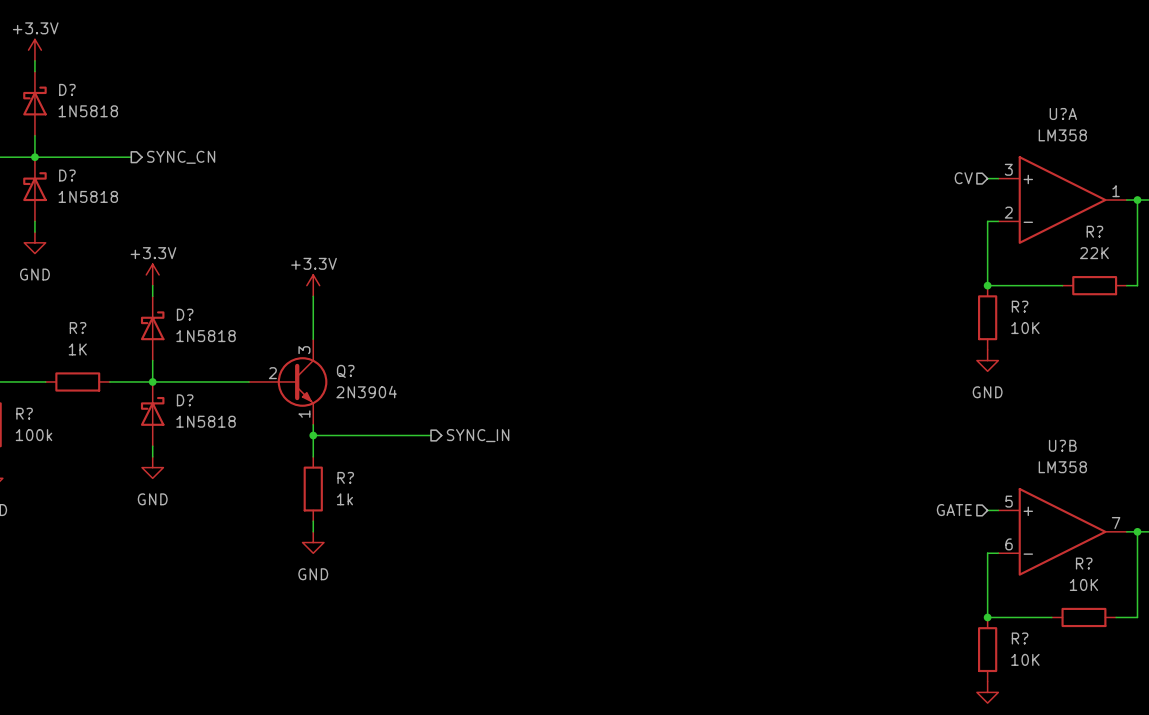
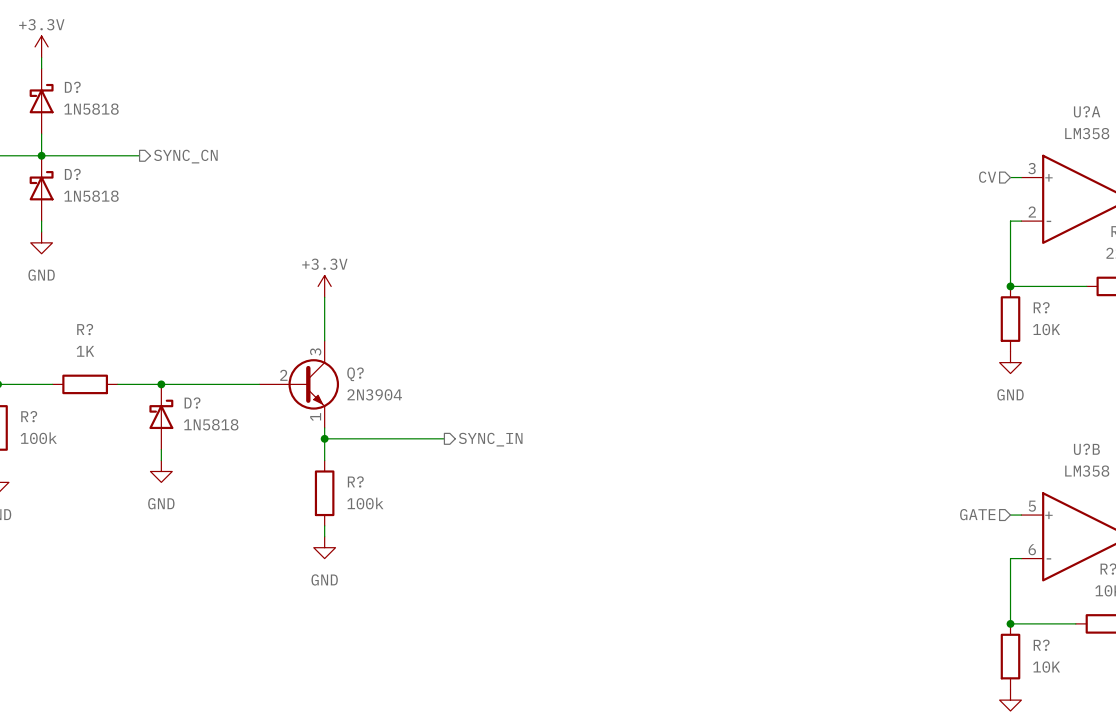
power symbol: +3.3V (152, 274) -> none
wire: (152, 285) (152, 296) -> none
D?: 1N5818 (152, 328) -> none
wire: (152, 360) (152, 381) -> none
R? value: 1k (344, 499) -> 100k (365, 503)

